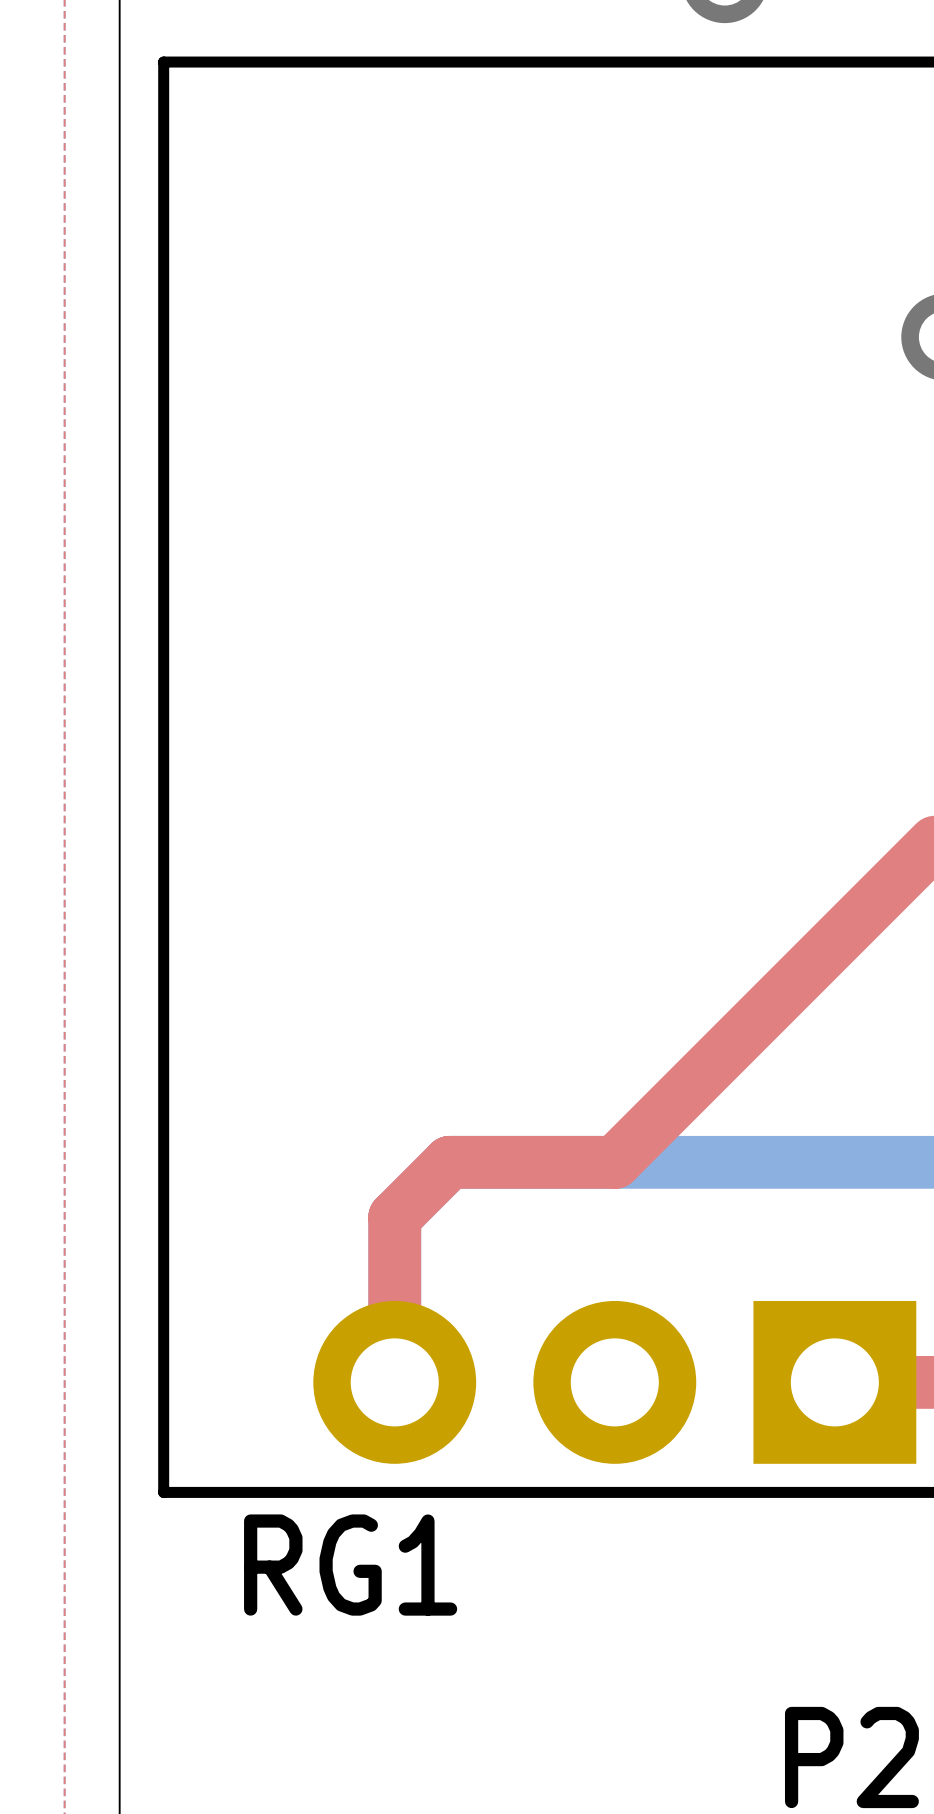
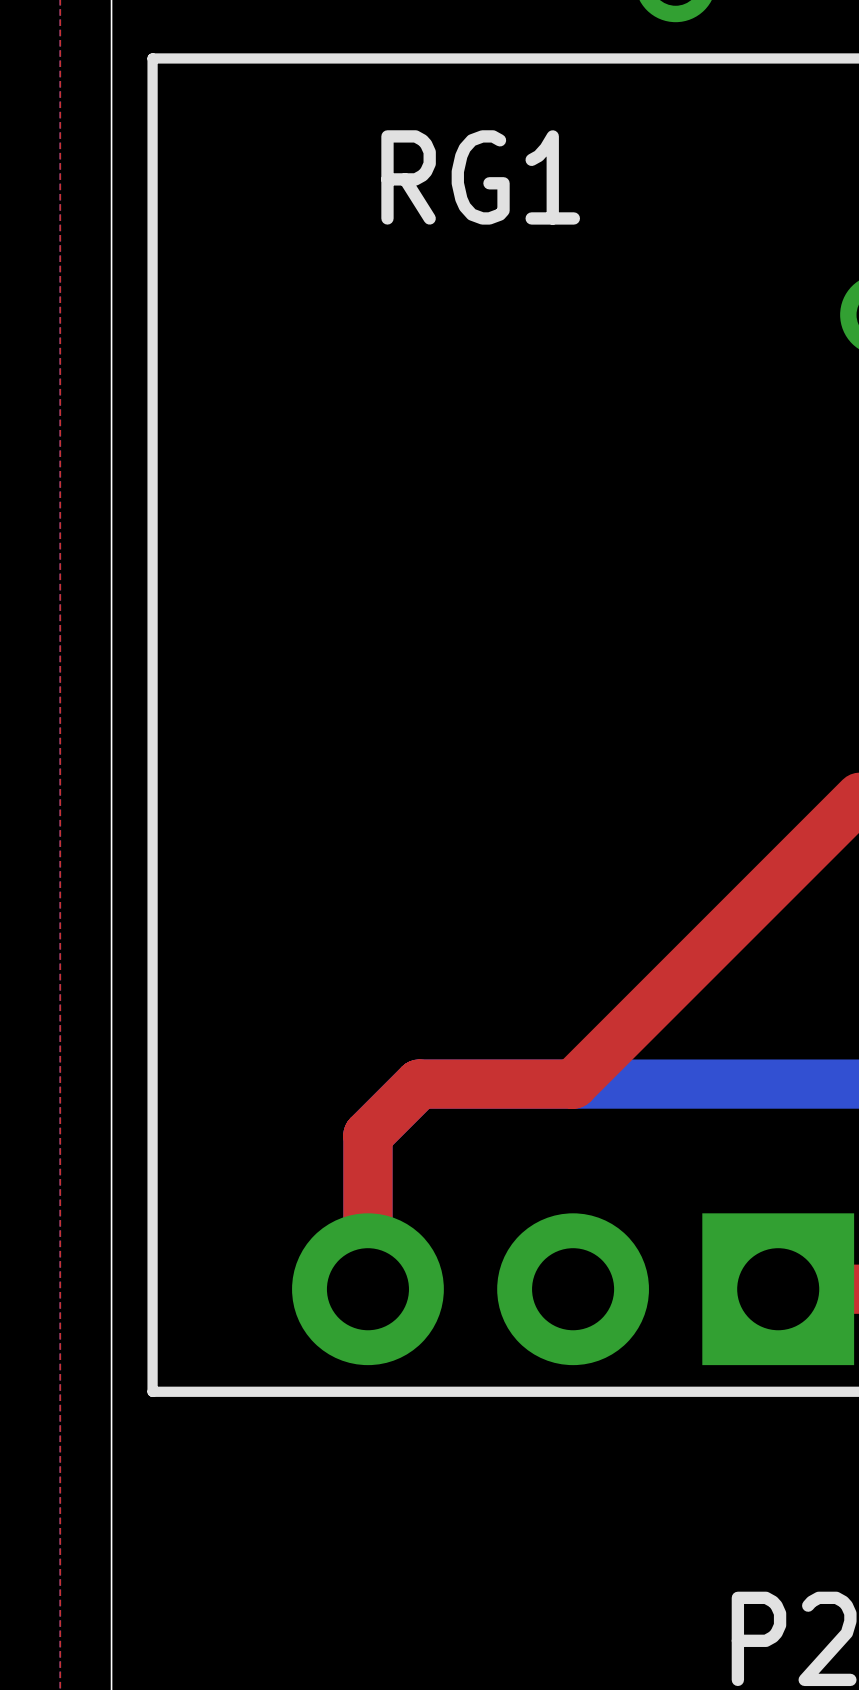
RG1 name position: RG1 (350, 1565) -> RG1 (480, 177)

